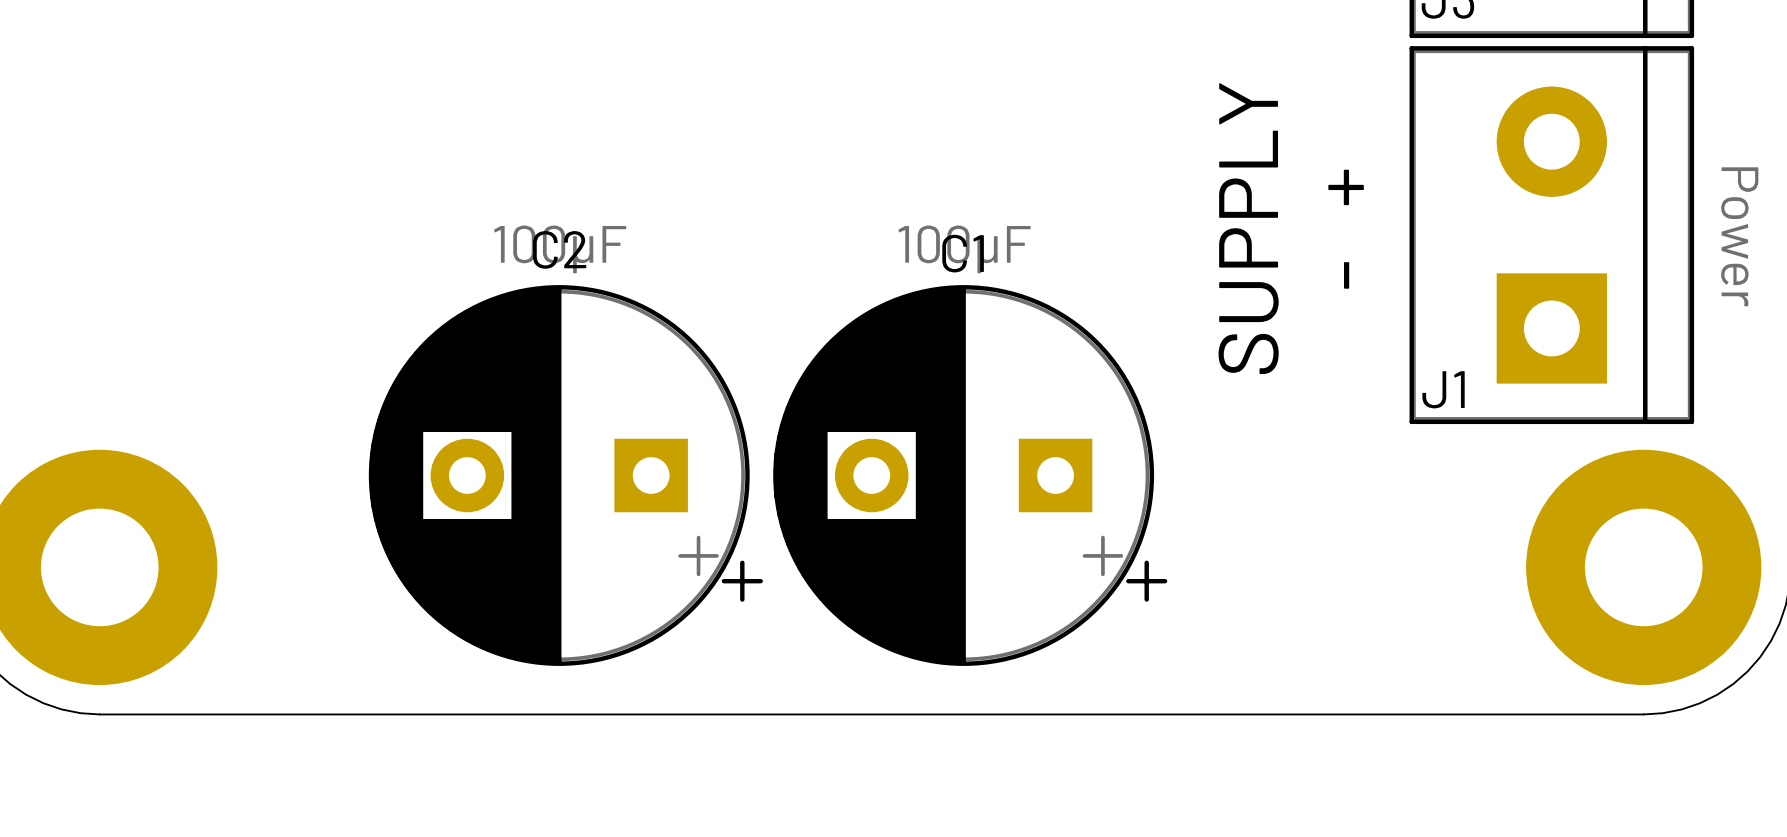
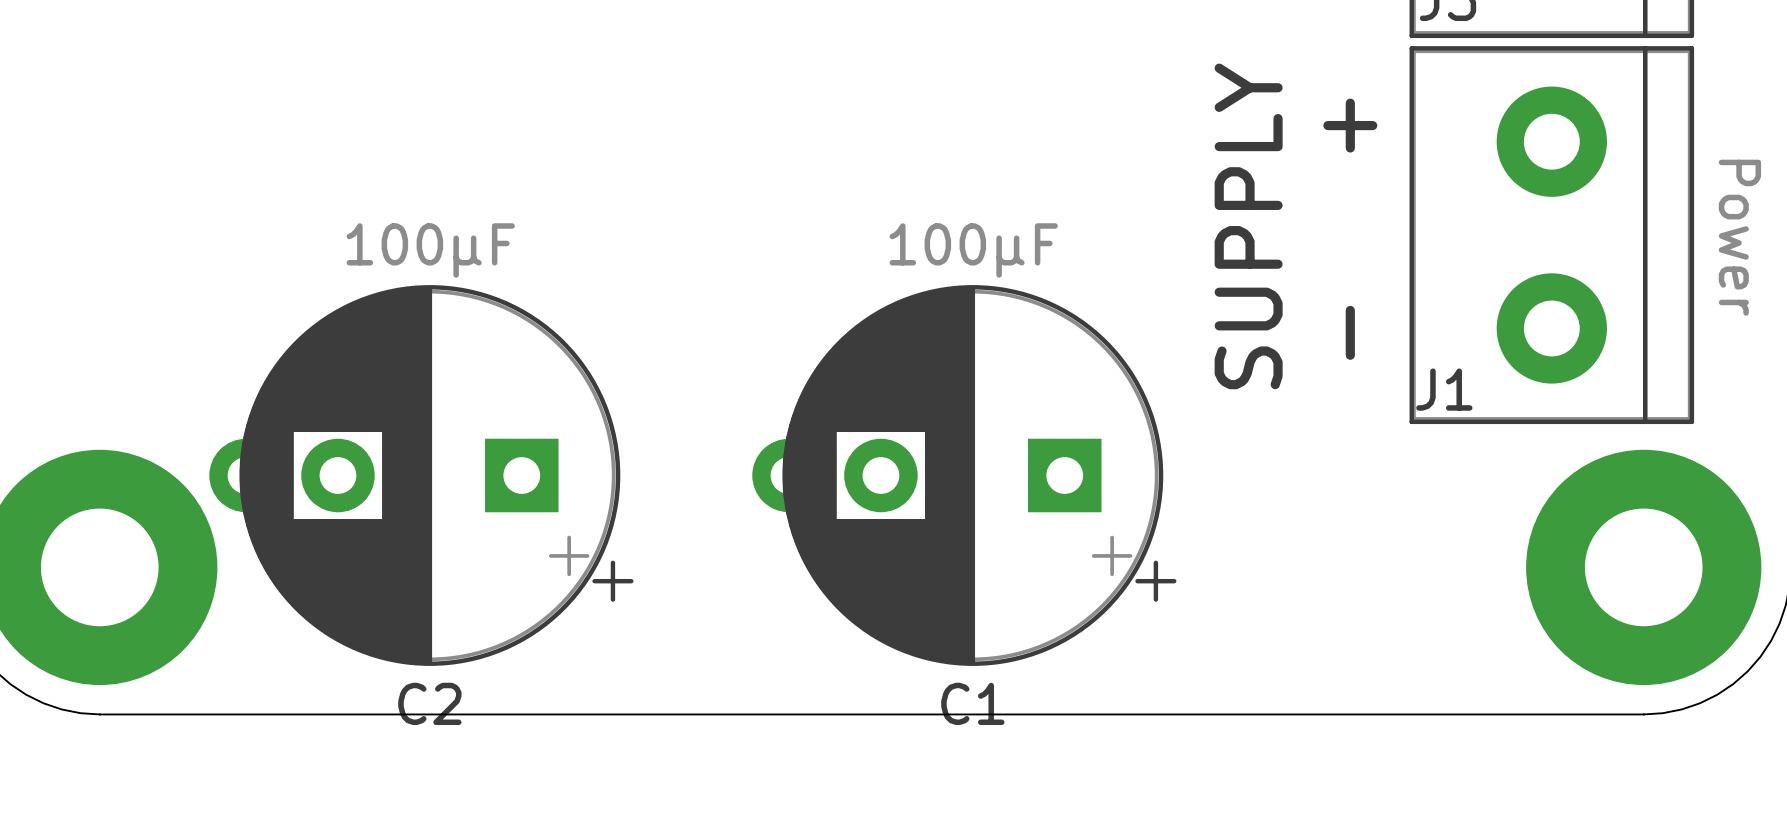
J1 footprint: [1409, 46, 1695, 425] -> [1409, 46, 1695, 425]
C2 name position: C2 (559, 249) -> C2 (429, 703)
C1 name position: C1 (963, 253) -> C1 (972, 703)
C2 footprint: [368, 285, 763, 666] -> [209, 285, 634, 666]
C1 footprint: [773, 285, 1168, 666] -> [752, 285, 1177, 666]

